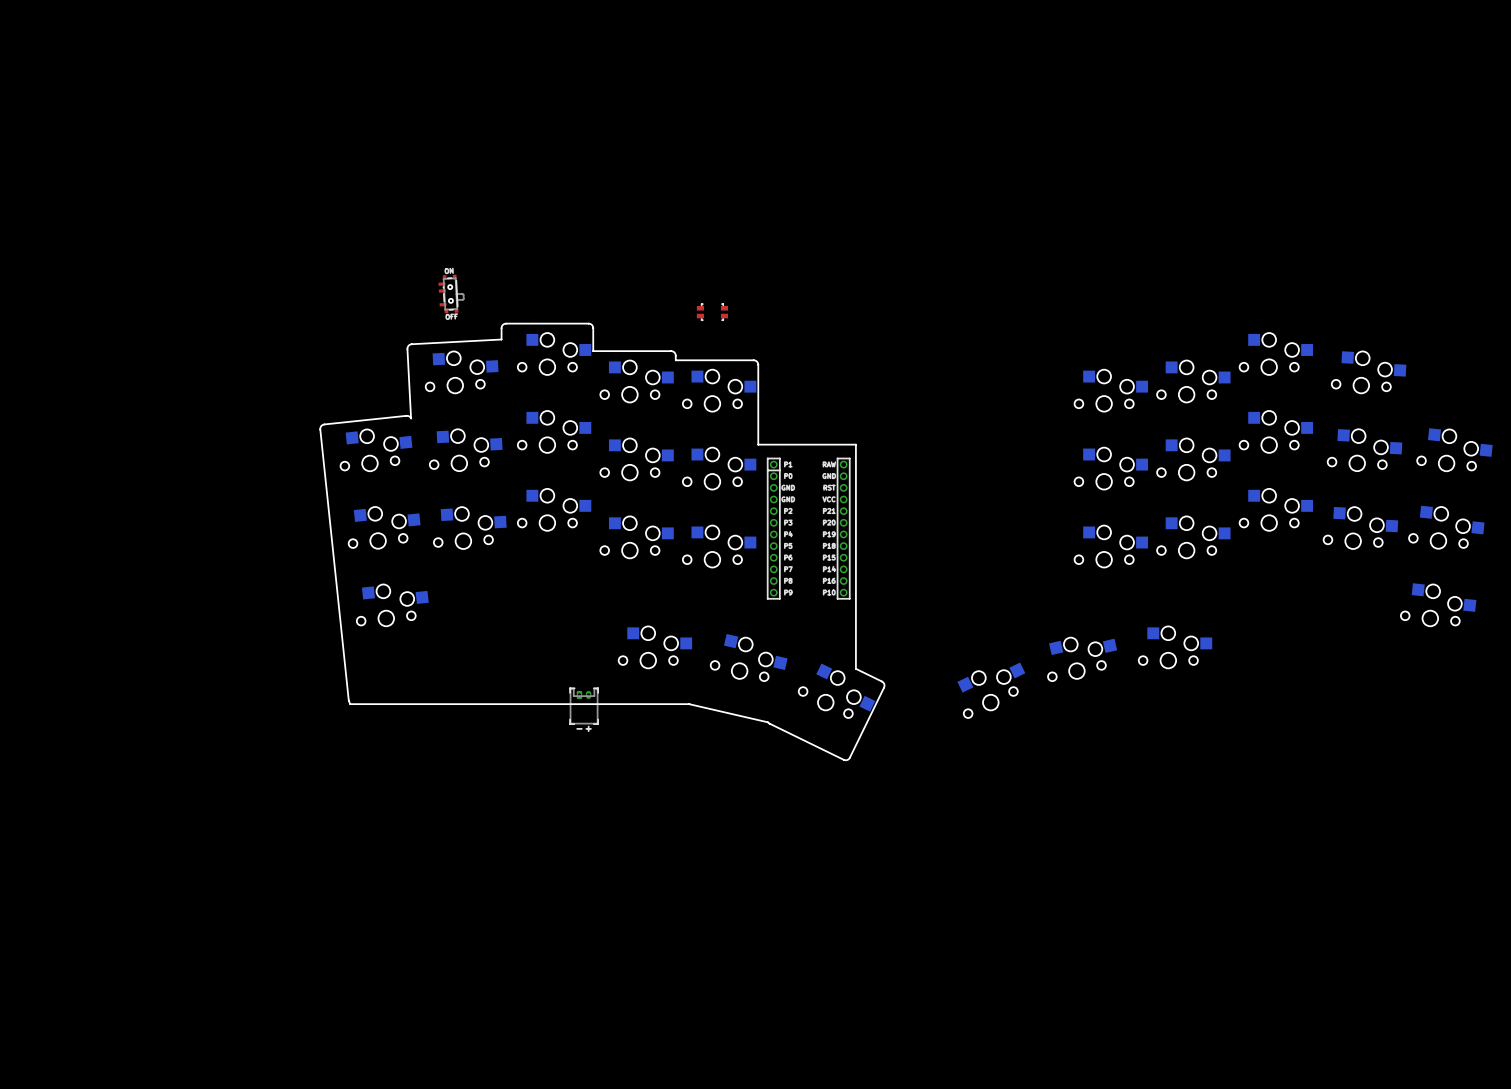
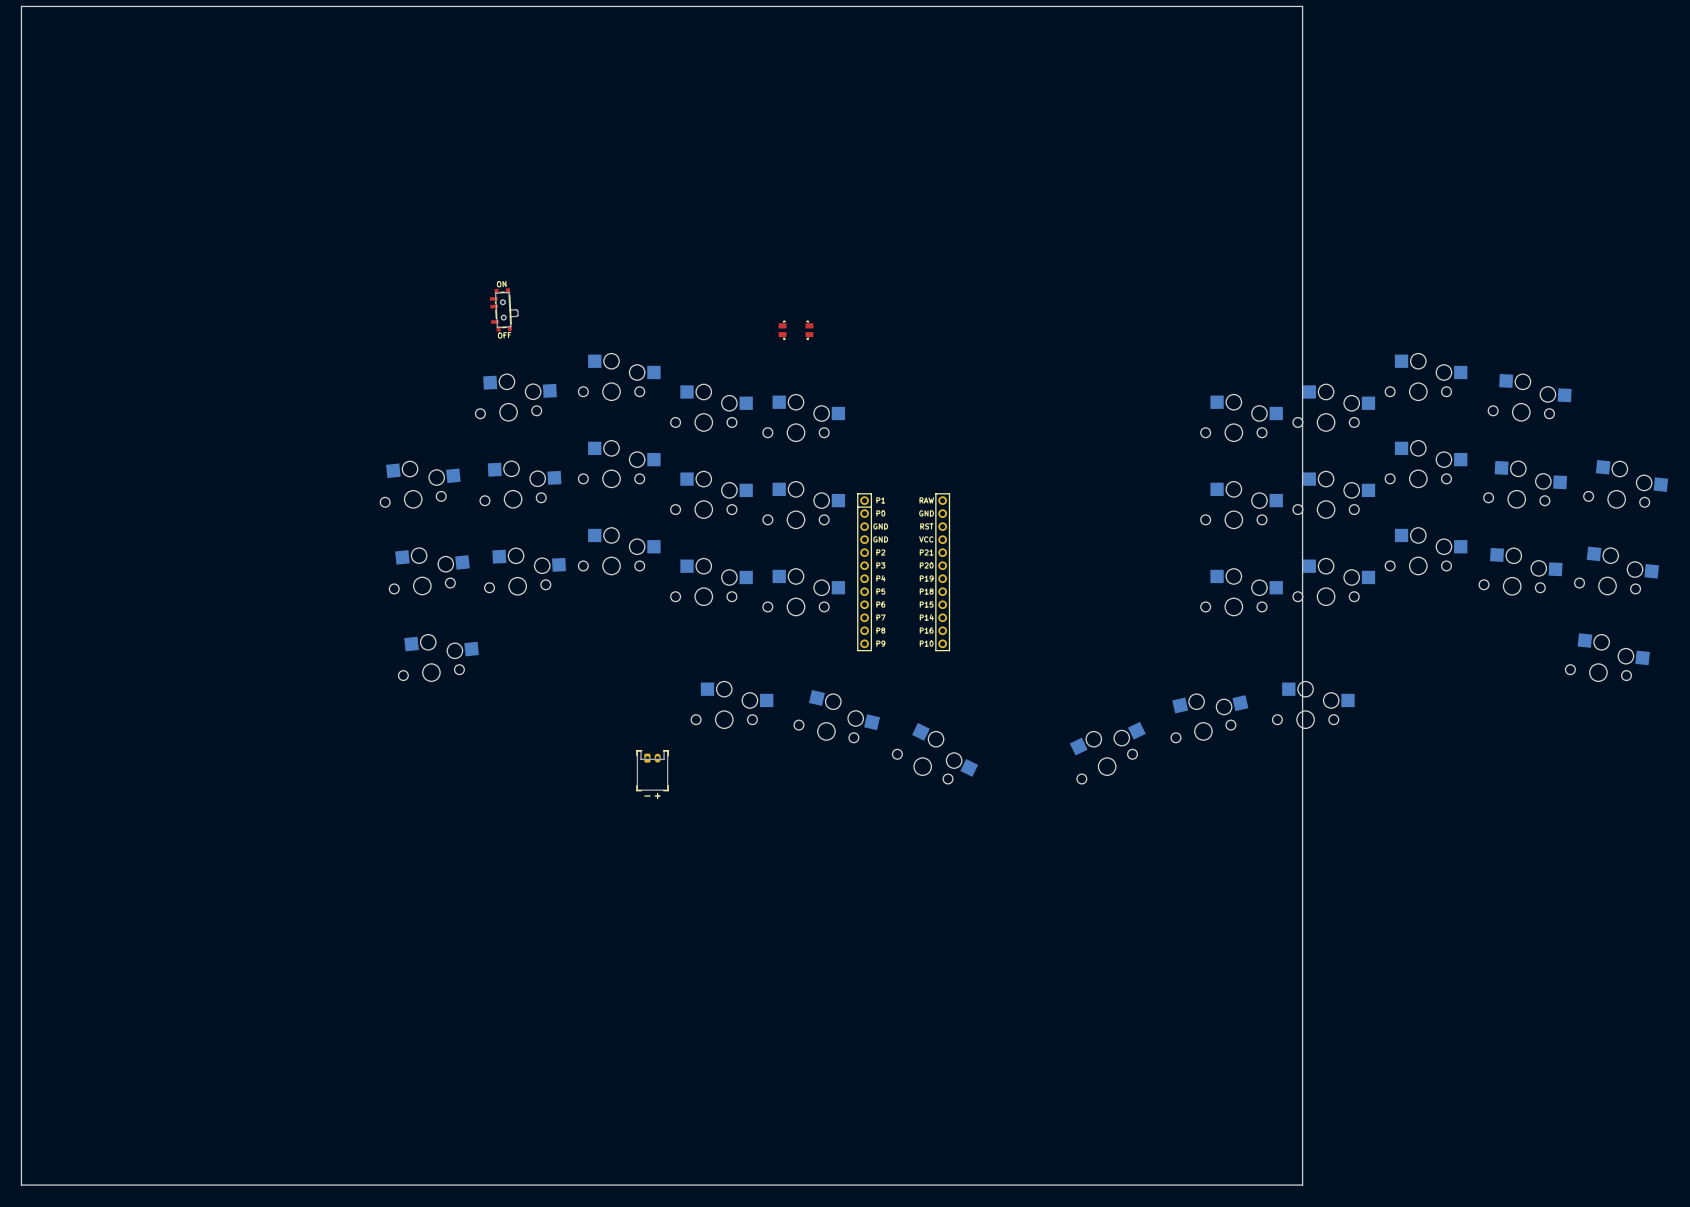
board edge: none -> (21, 6) (21, 1185) (1302, 1185) (1302, 6) (21, 6)
board edge: (506, 323) (590, 323) (593, 327) (593, 351) (671, 351) (675, 353) (675, 360) (755, 360) (758, 364) (758, 444) (855, 444) (855, 668) (882, 681) (884, 685) (848, 759) (843, 759) (767, 722) (689, 704) (350, 704) (320, 427) (324, 424) (406, 415) (411, 418) (408, 345) (501, 339) (501, 326) (506, 323) -> none

